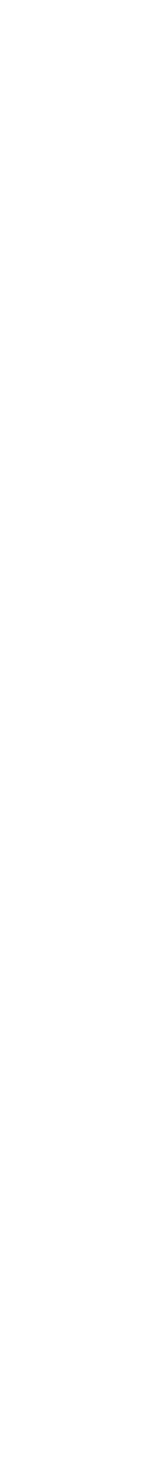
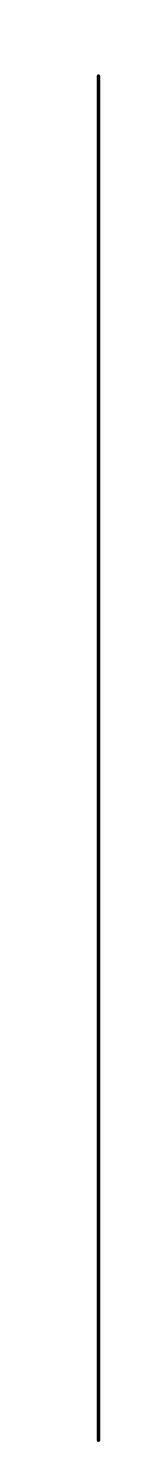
board edge: none -> (98, 76) (98, 1440)

